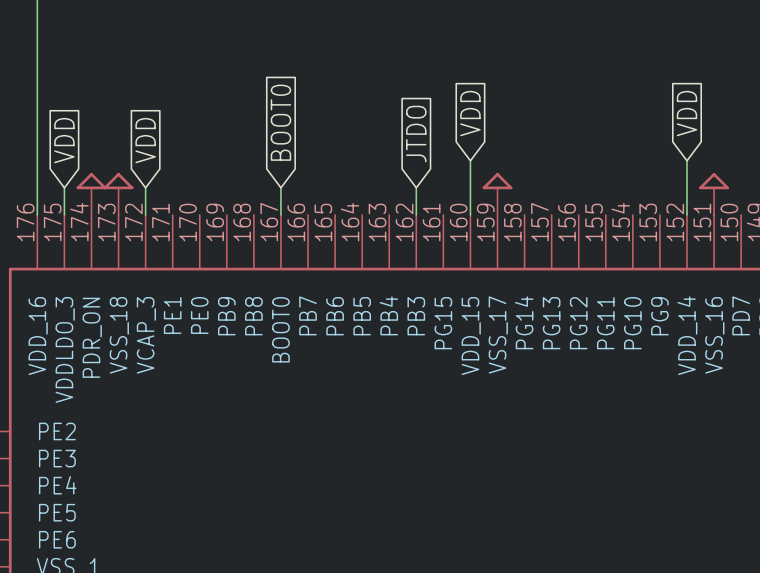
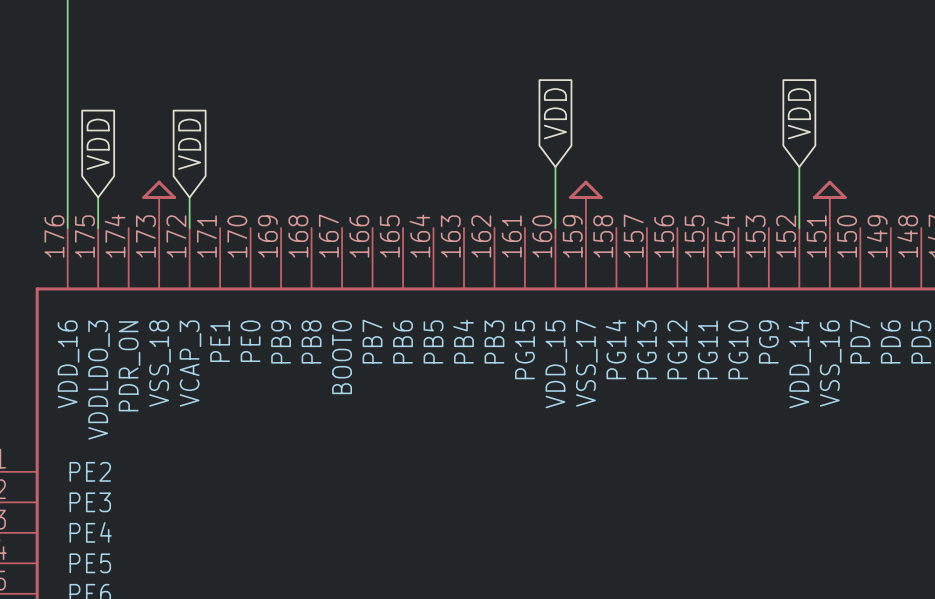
global label: BOOT0 (280, 122) -> none
global label: JTDO (416, 134) -> none
wire: (280, 187) (280, 214) -> none
wire: (416, 187) (416, 214) -> none
power symbol: (91, 193) -> none

